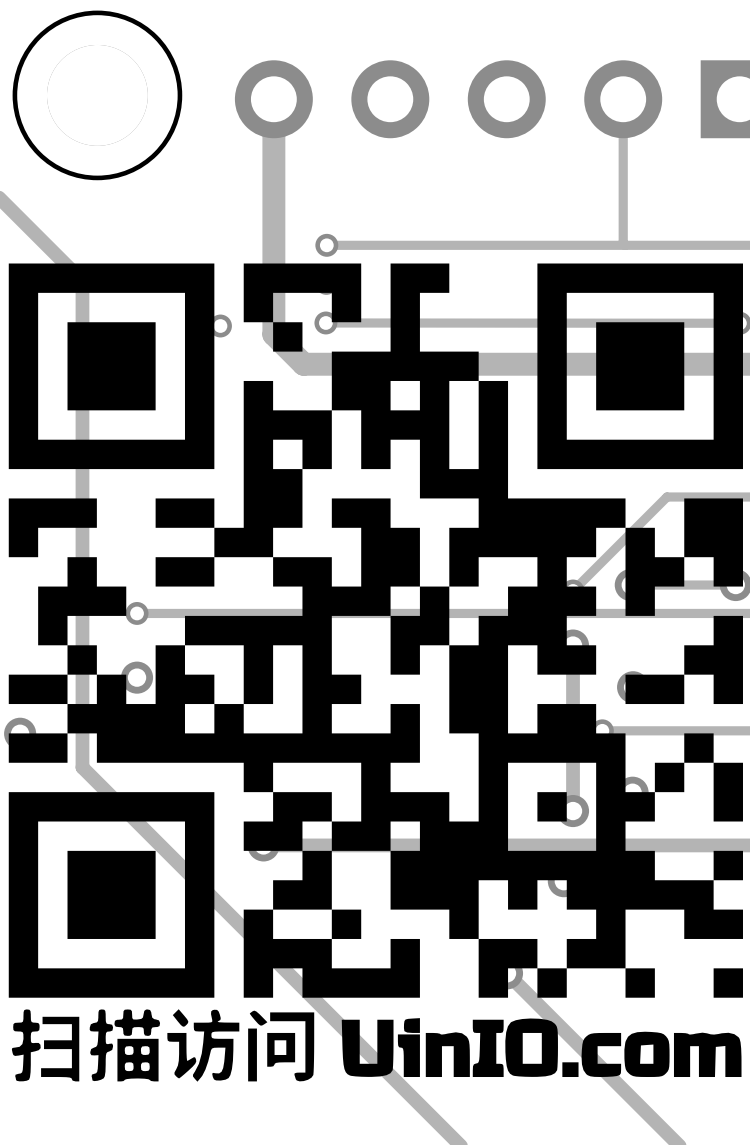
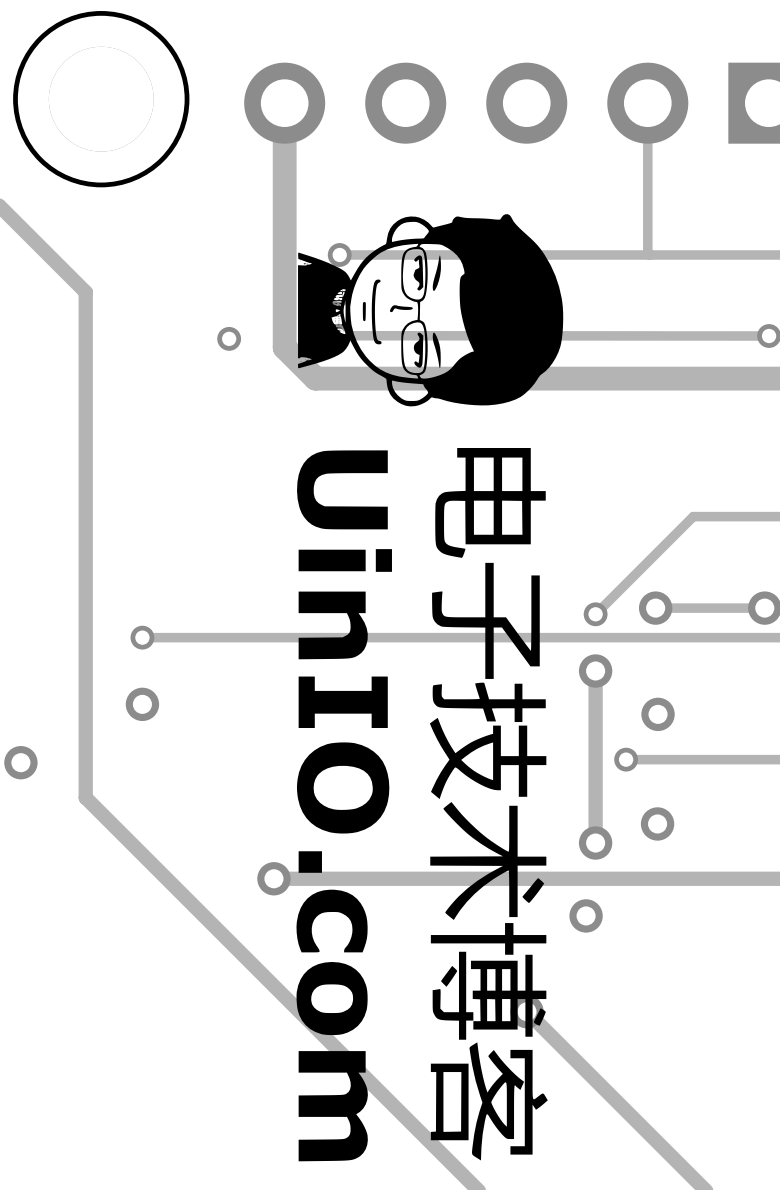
drawing shape: [8, 263, 743, 1082] -> [296, 214, 564, 1162]

